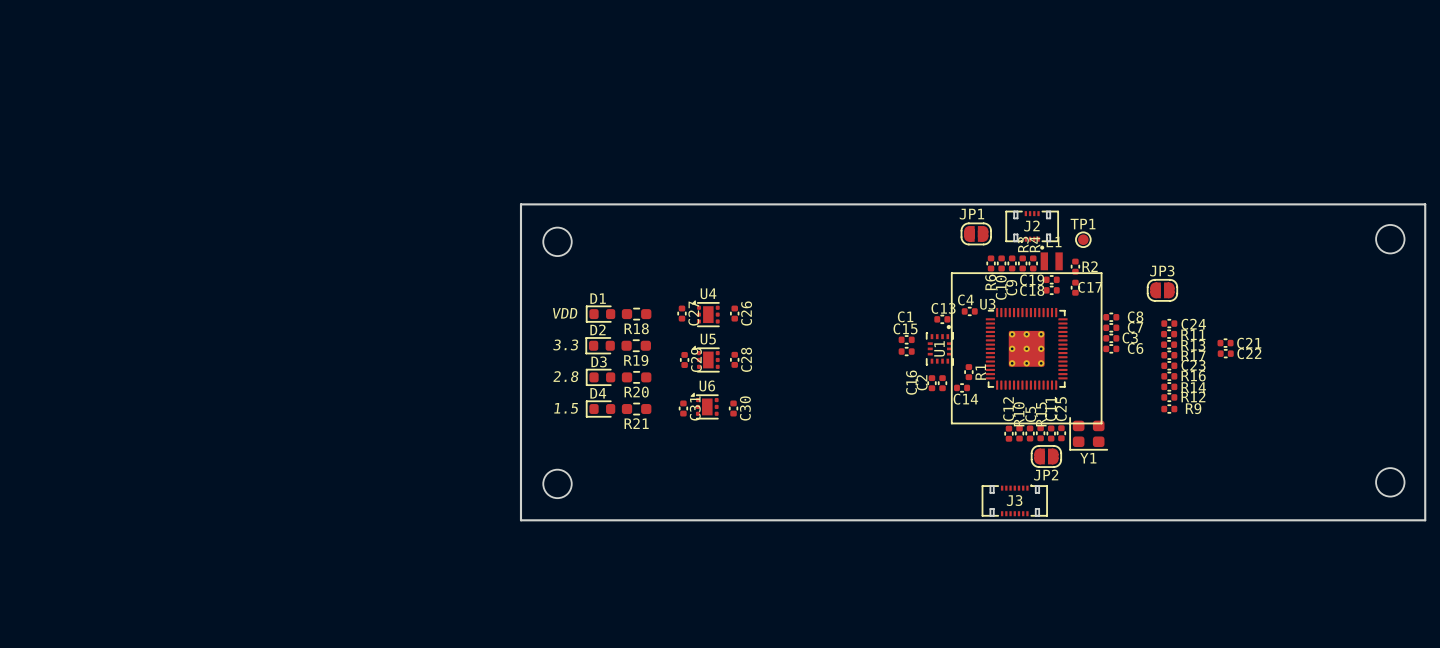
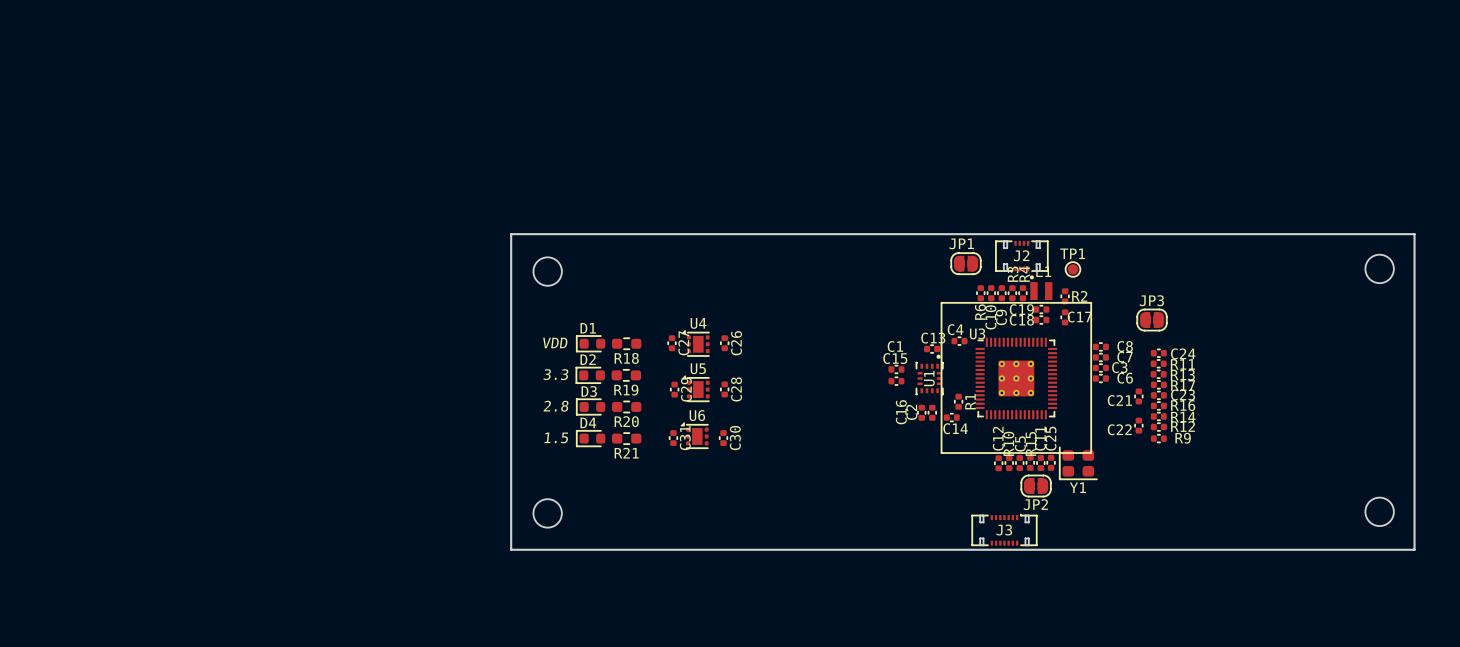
C21 rotation: 0° (1225, 343) -> 90° clockwise (1138, 396)
C21 position: (1225, 343) -> (1138, 396)
C21 name position: C21 (1249, 343) -> C21 (1119, 400)
C22 rotation: 0° (1225, 353) -> 90° clockwise (1138, 425)
C22 position: (1225, 353) -> (1138, 425)
C22 name position: C22 (1249, 353) -> C22 (1119, 429)

